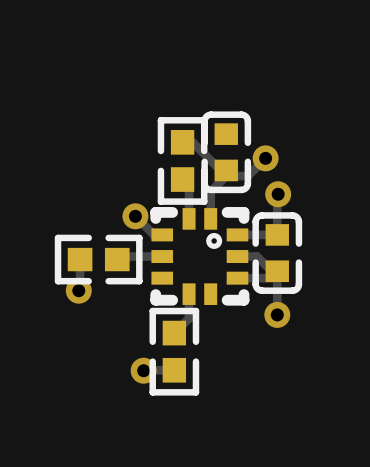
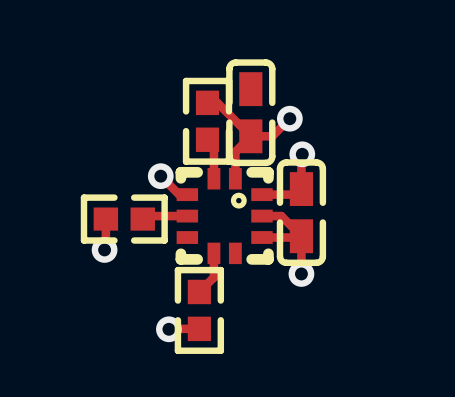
part footprint: [201, 111, 252, 194] -> [226, 59, 276, 167]
part footprint: [252, 212, 303, 294] -> [276, 159, 327, 267]

